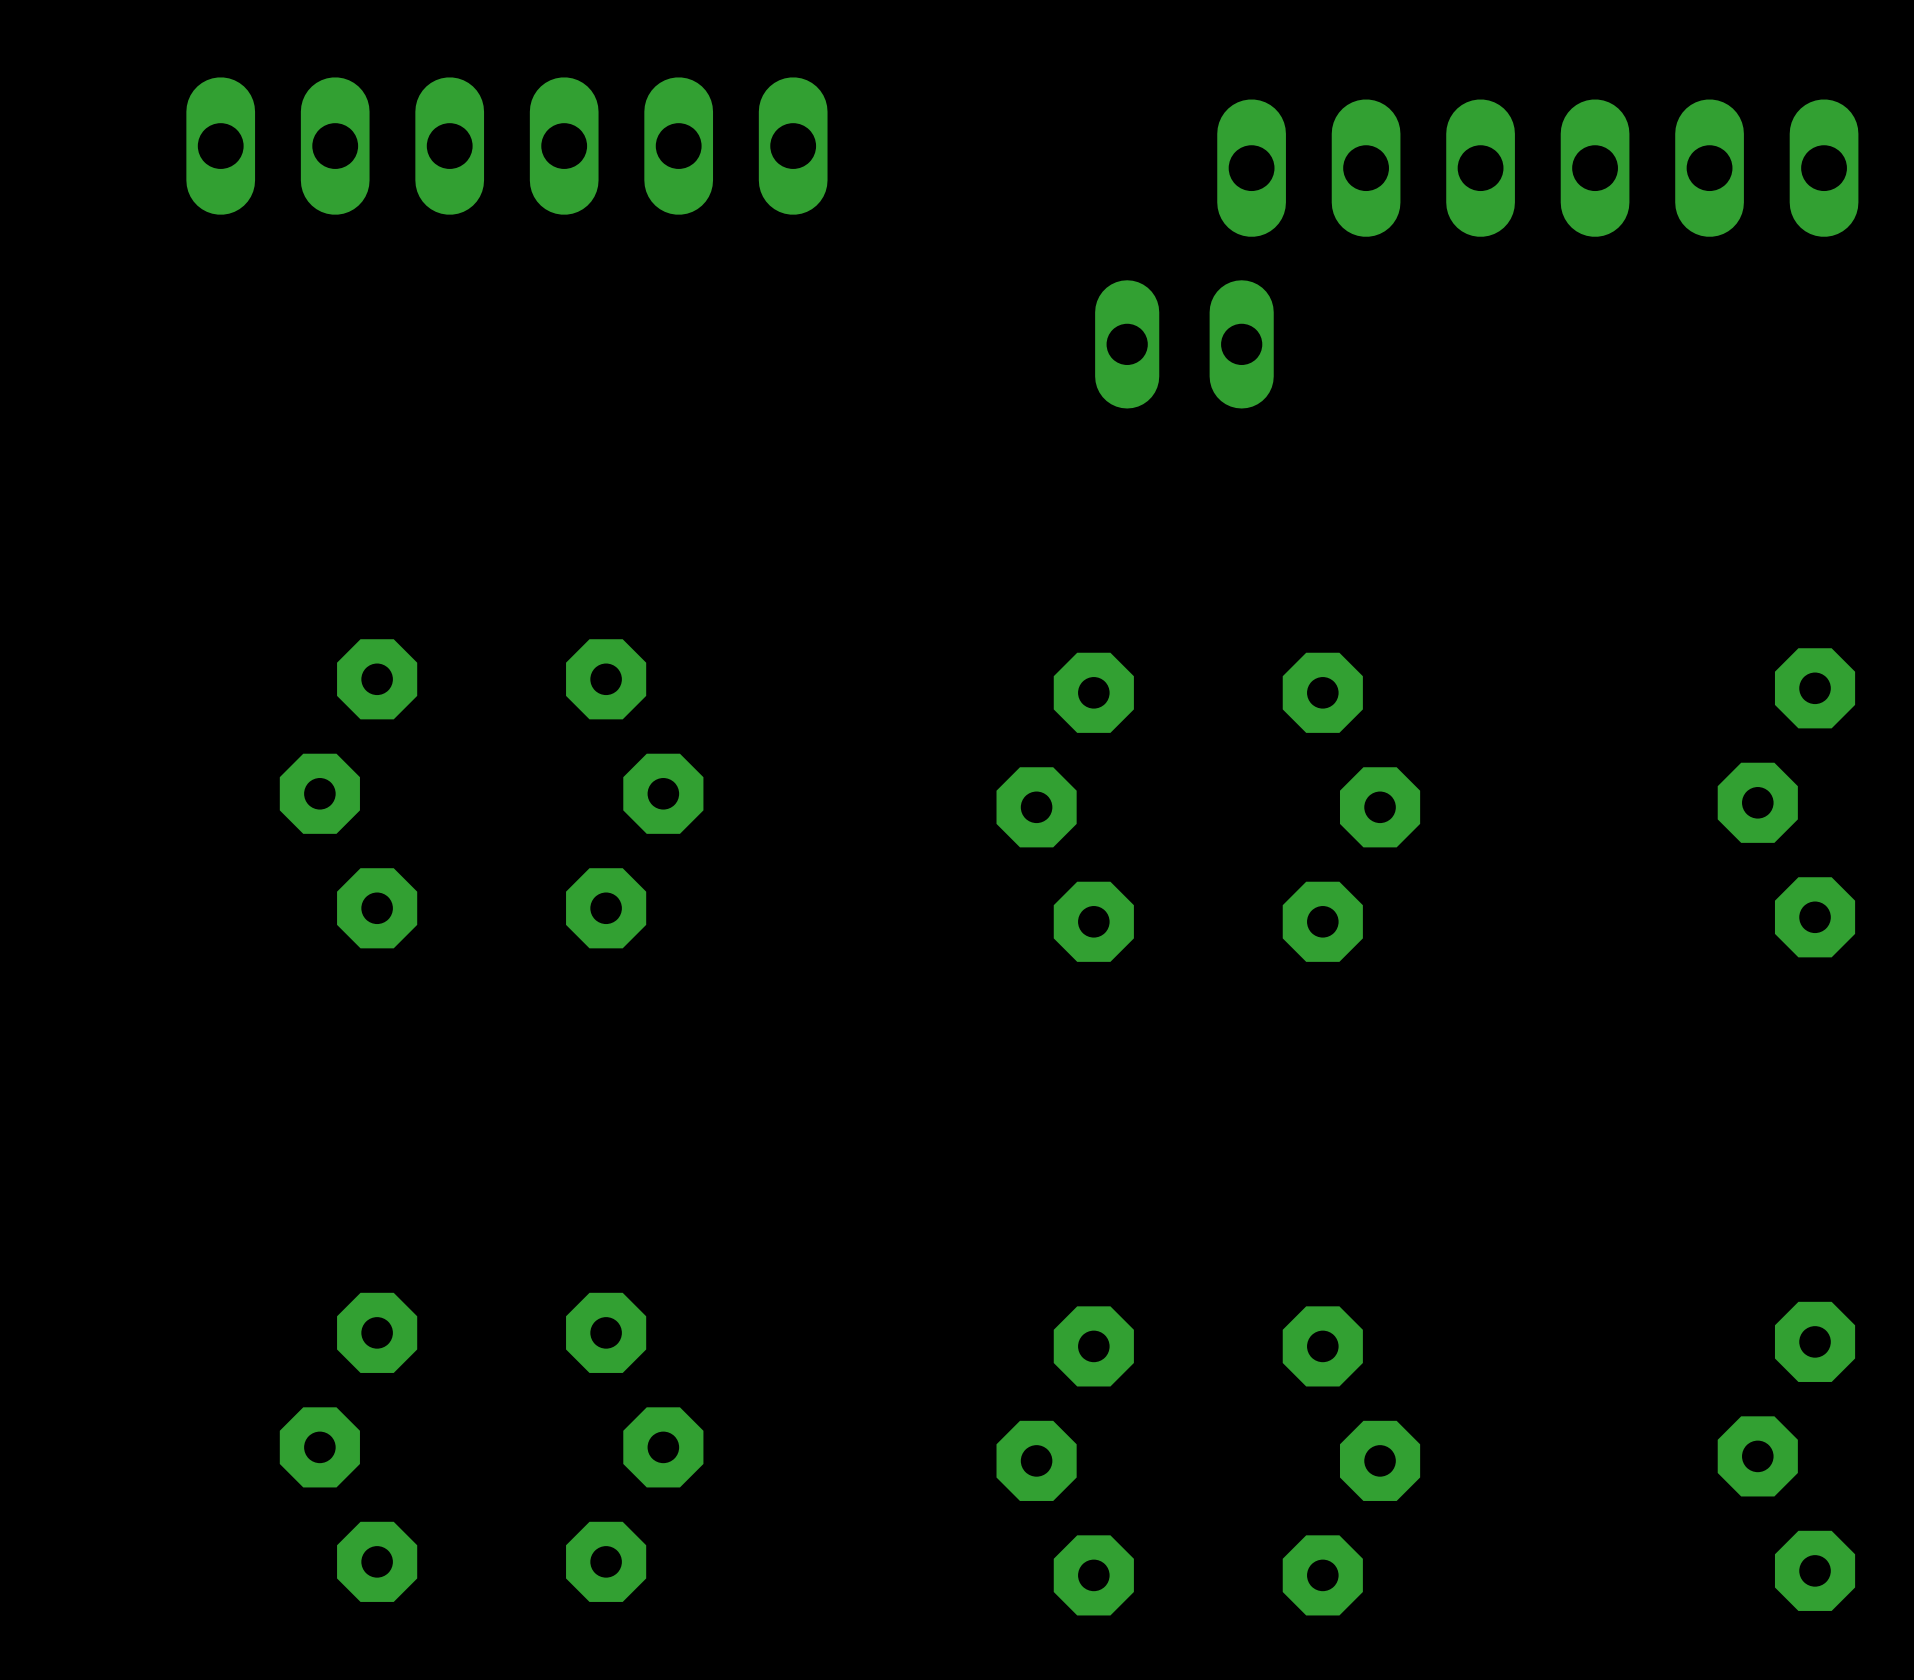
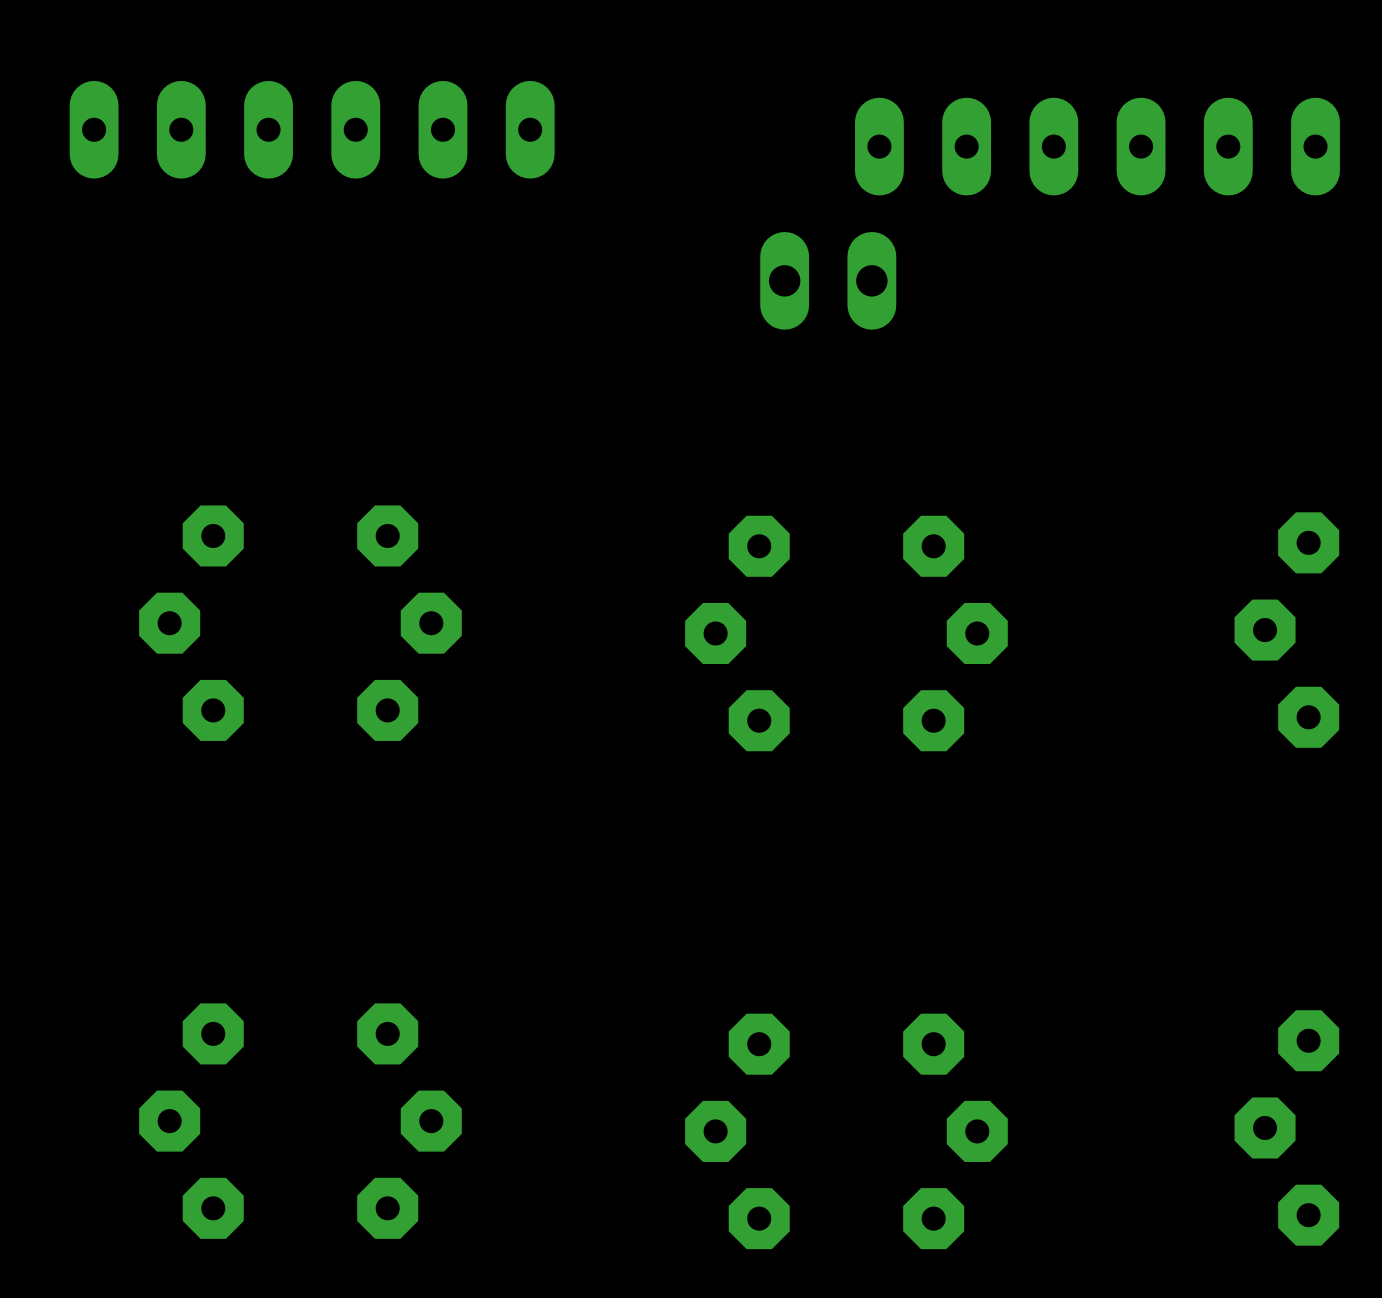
part footprint: [186, 77, 828, 215] -> [69, 80, 555, 179]
part footprint: [1217, 99, 1859, 237] -> [854, 97, 1340, 196]

